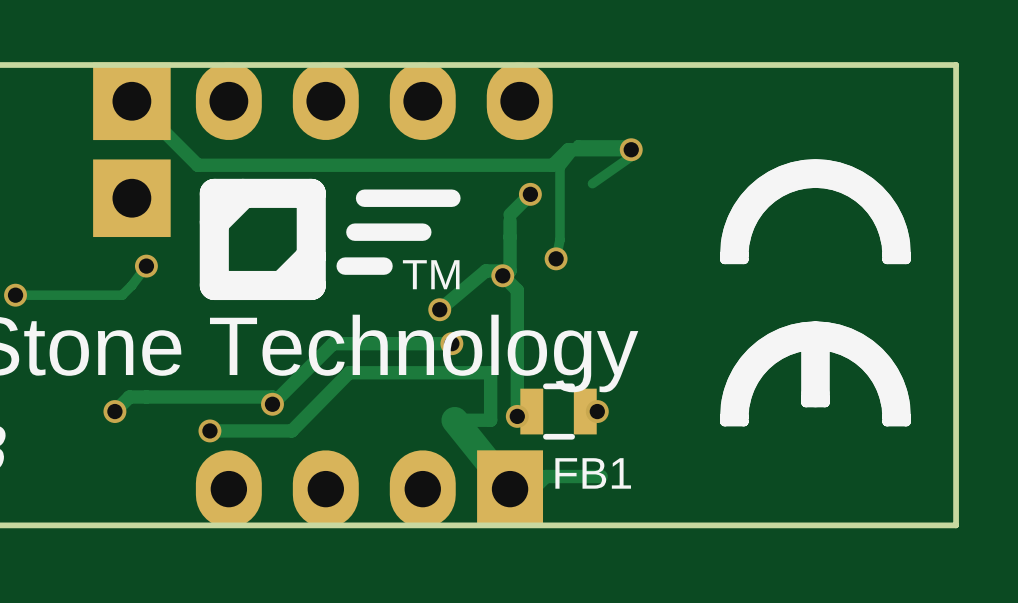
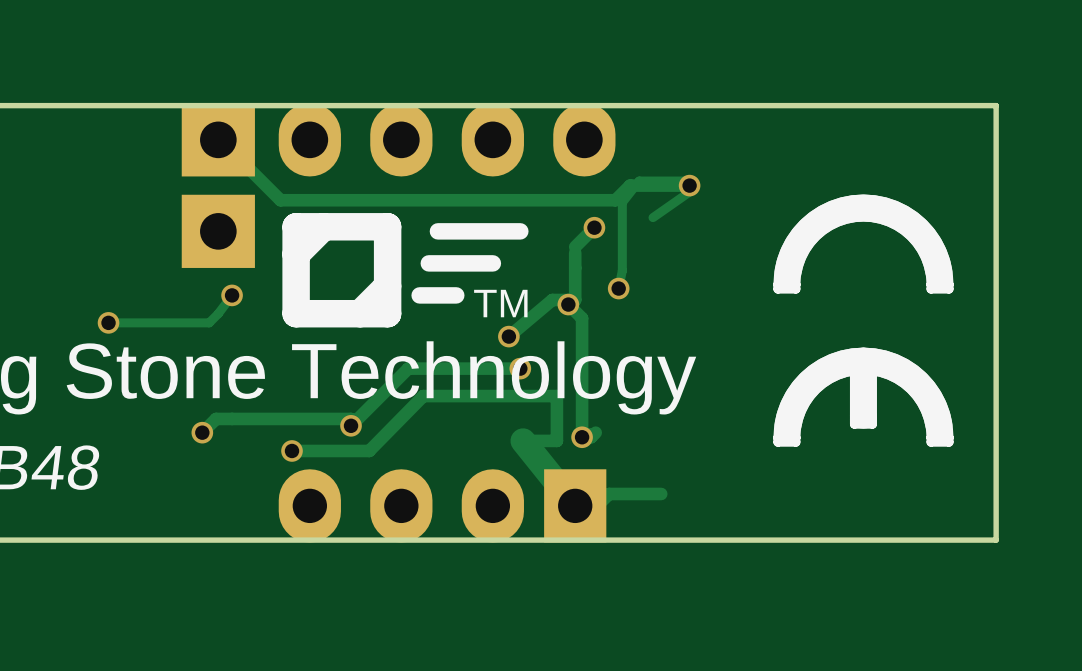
FB1: (558, 411) -> none
via: (597, 411) -> none

